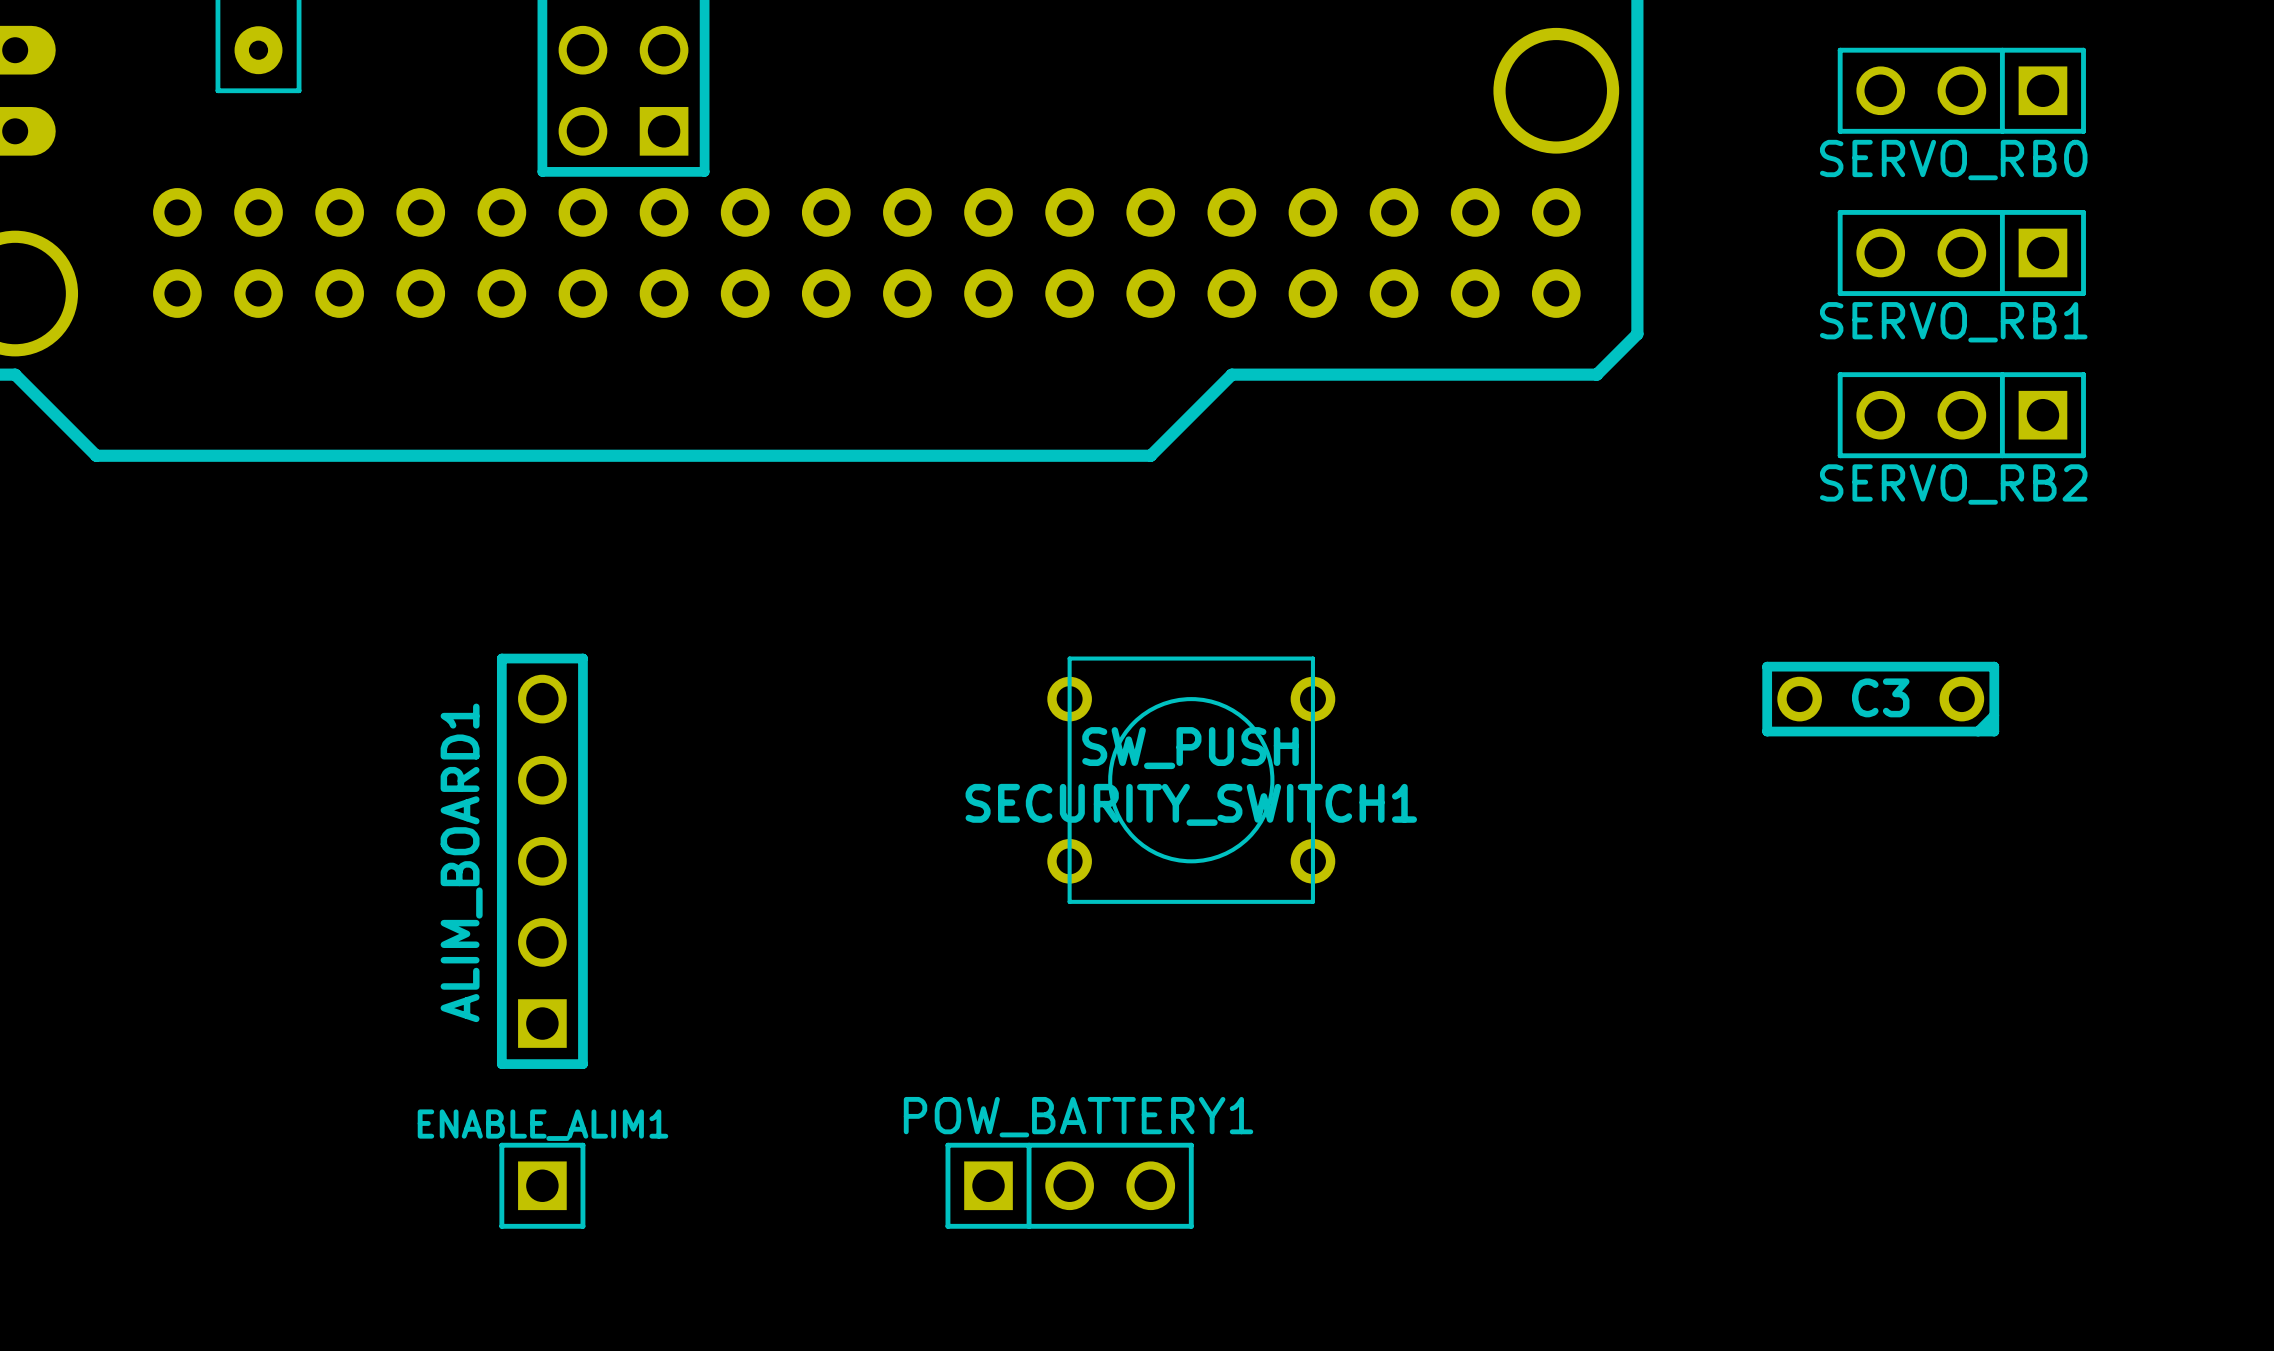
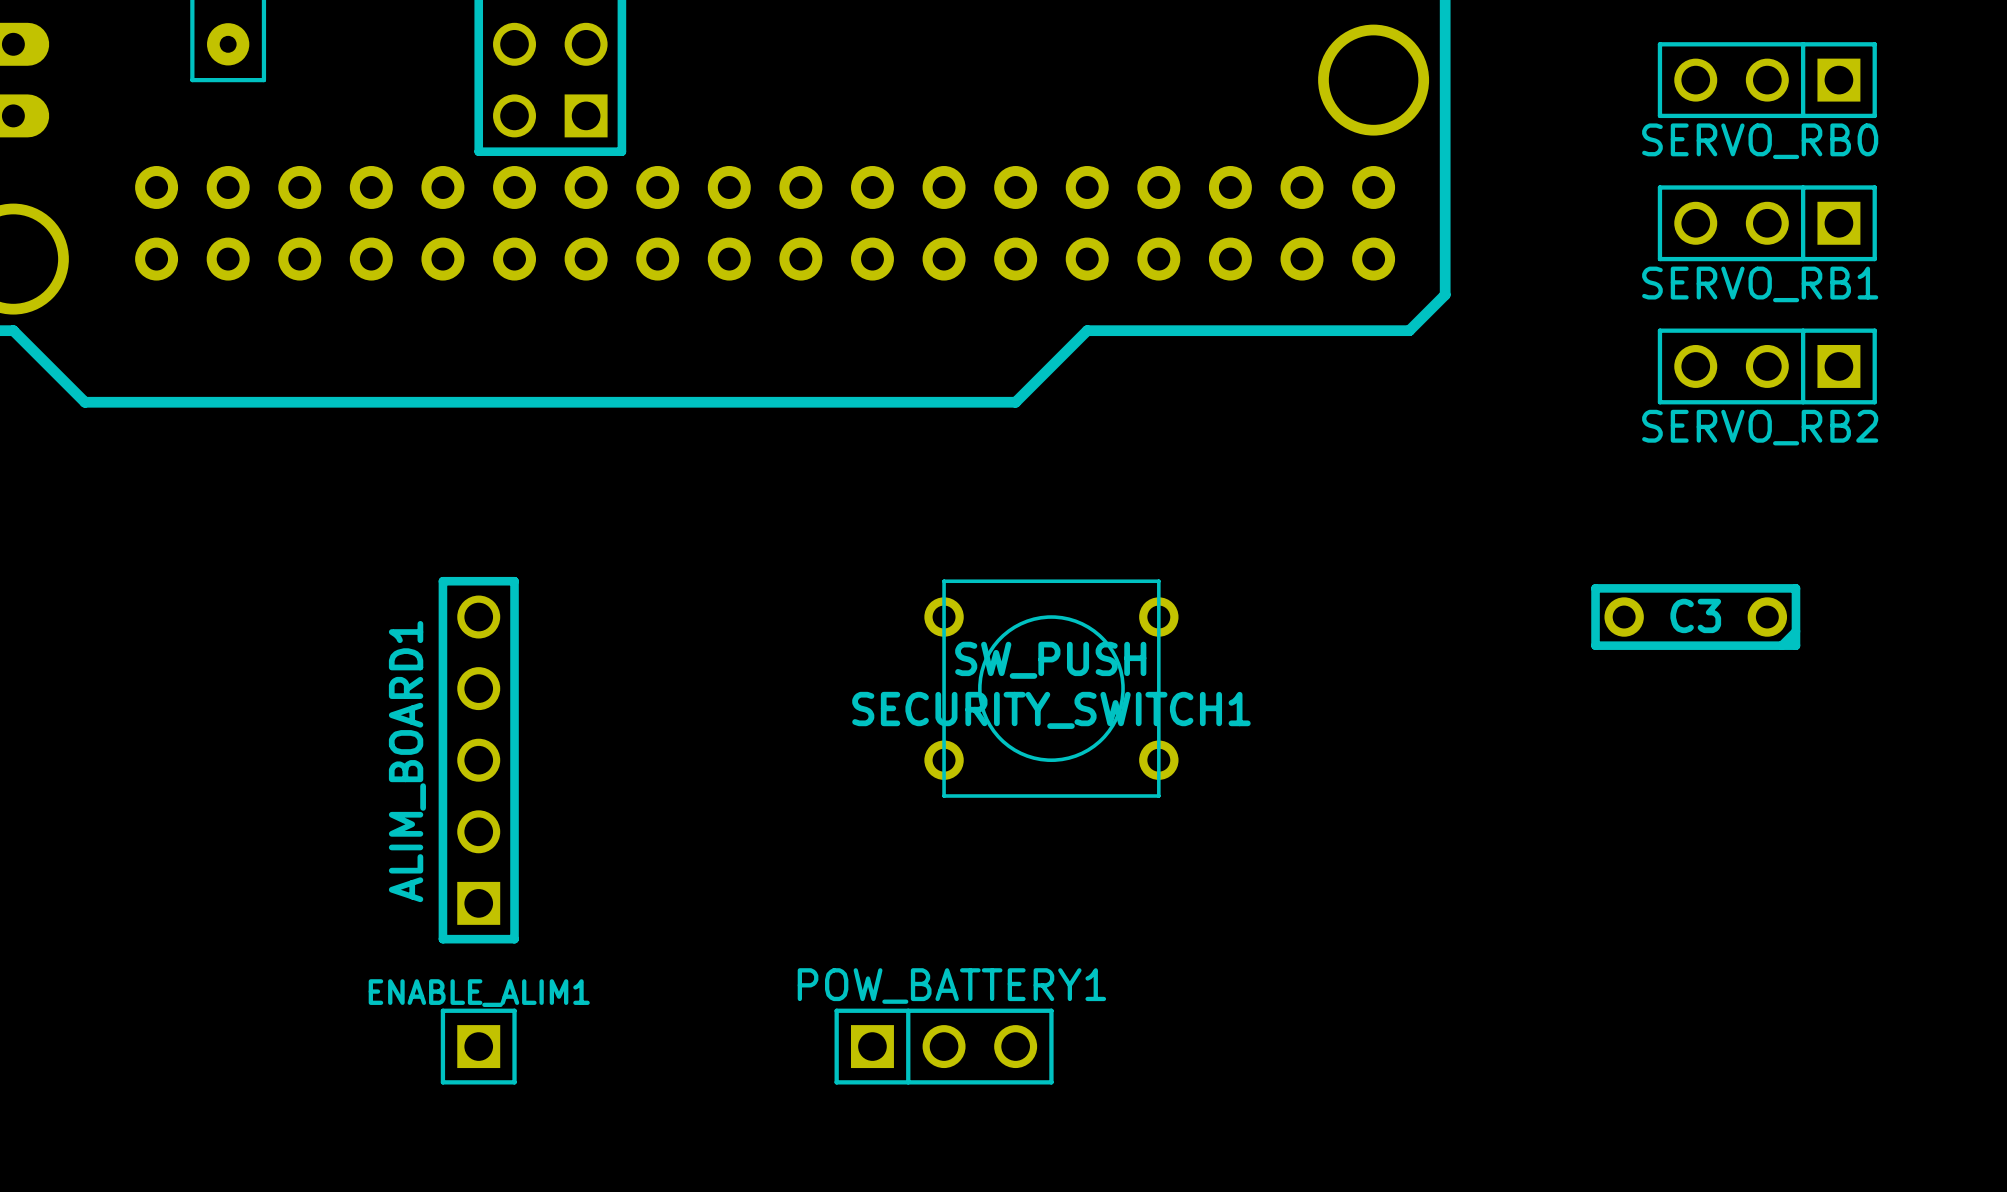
SERVO_RB0 position: (1961, 90) -> (1767, 80)
SERVO_RB1 position: (1961, 252) -> (1767, 223)
SERVO_RB2 position: (1961, 415) -> (1767, 366)
C3 position: (1880, 699) -> (1695, 617)

